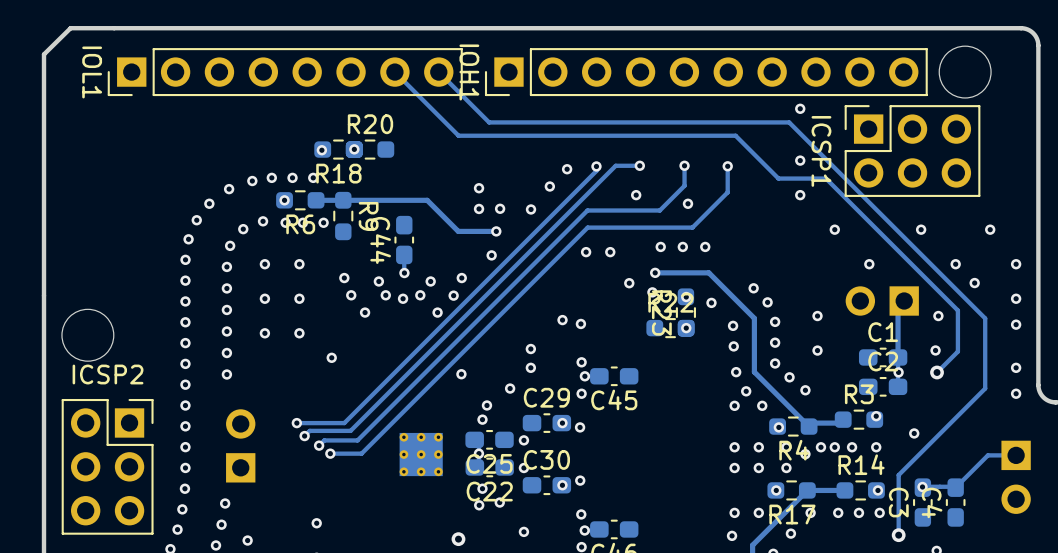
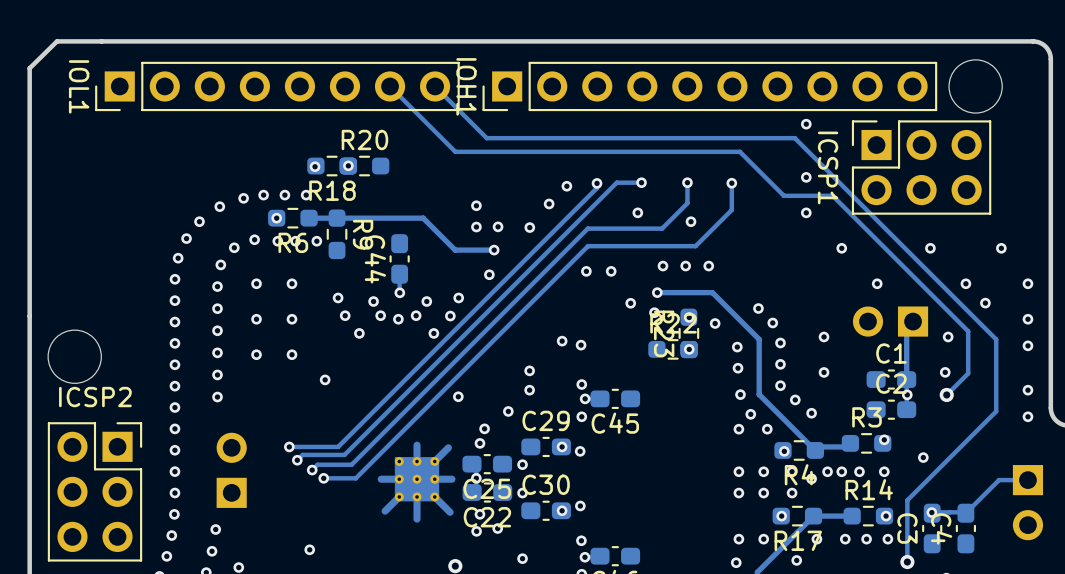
track: none -> (417, 445) (417, 519)
track: none -> (451, 479) (381, 479)
track: none -> (385, 511) (448, 447) (417, 479) (450, 512)

